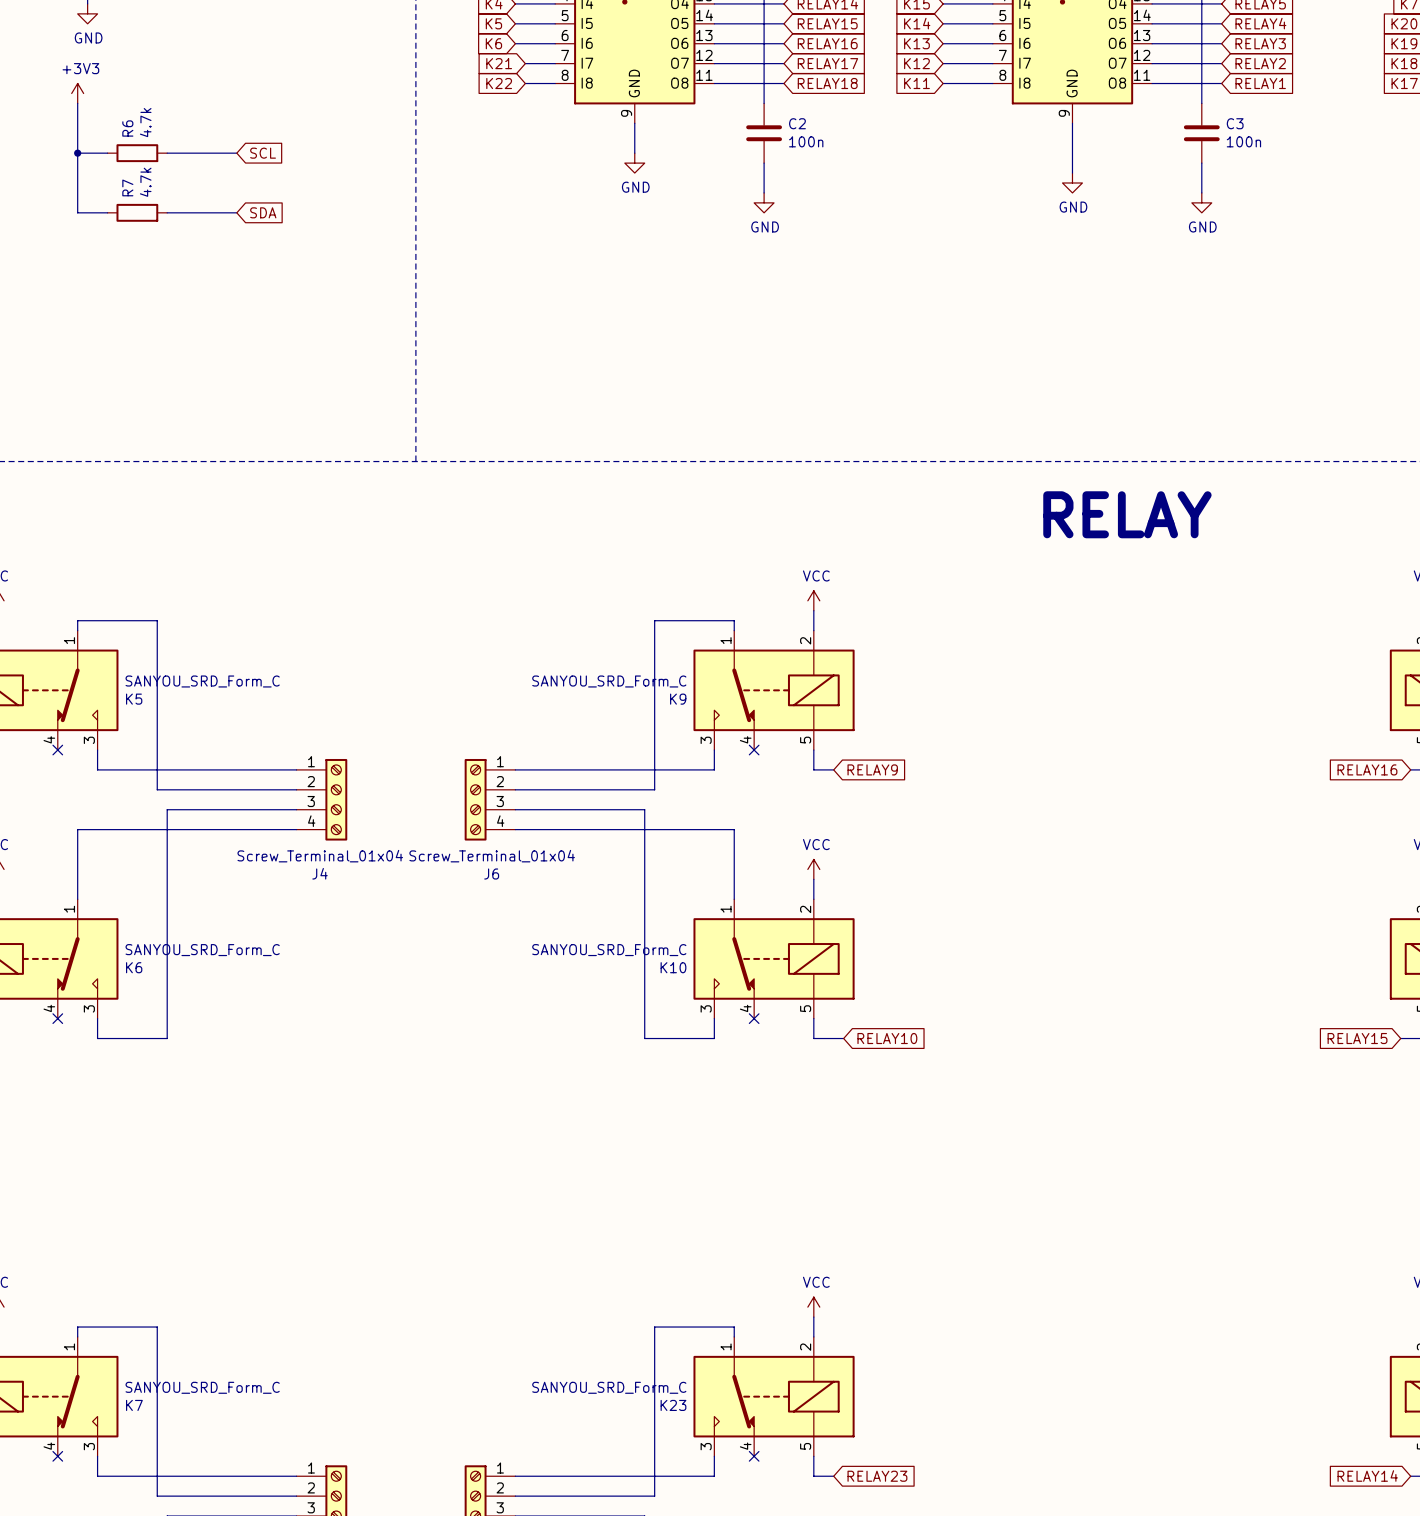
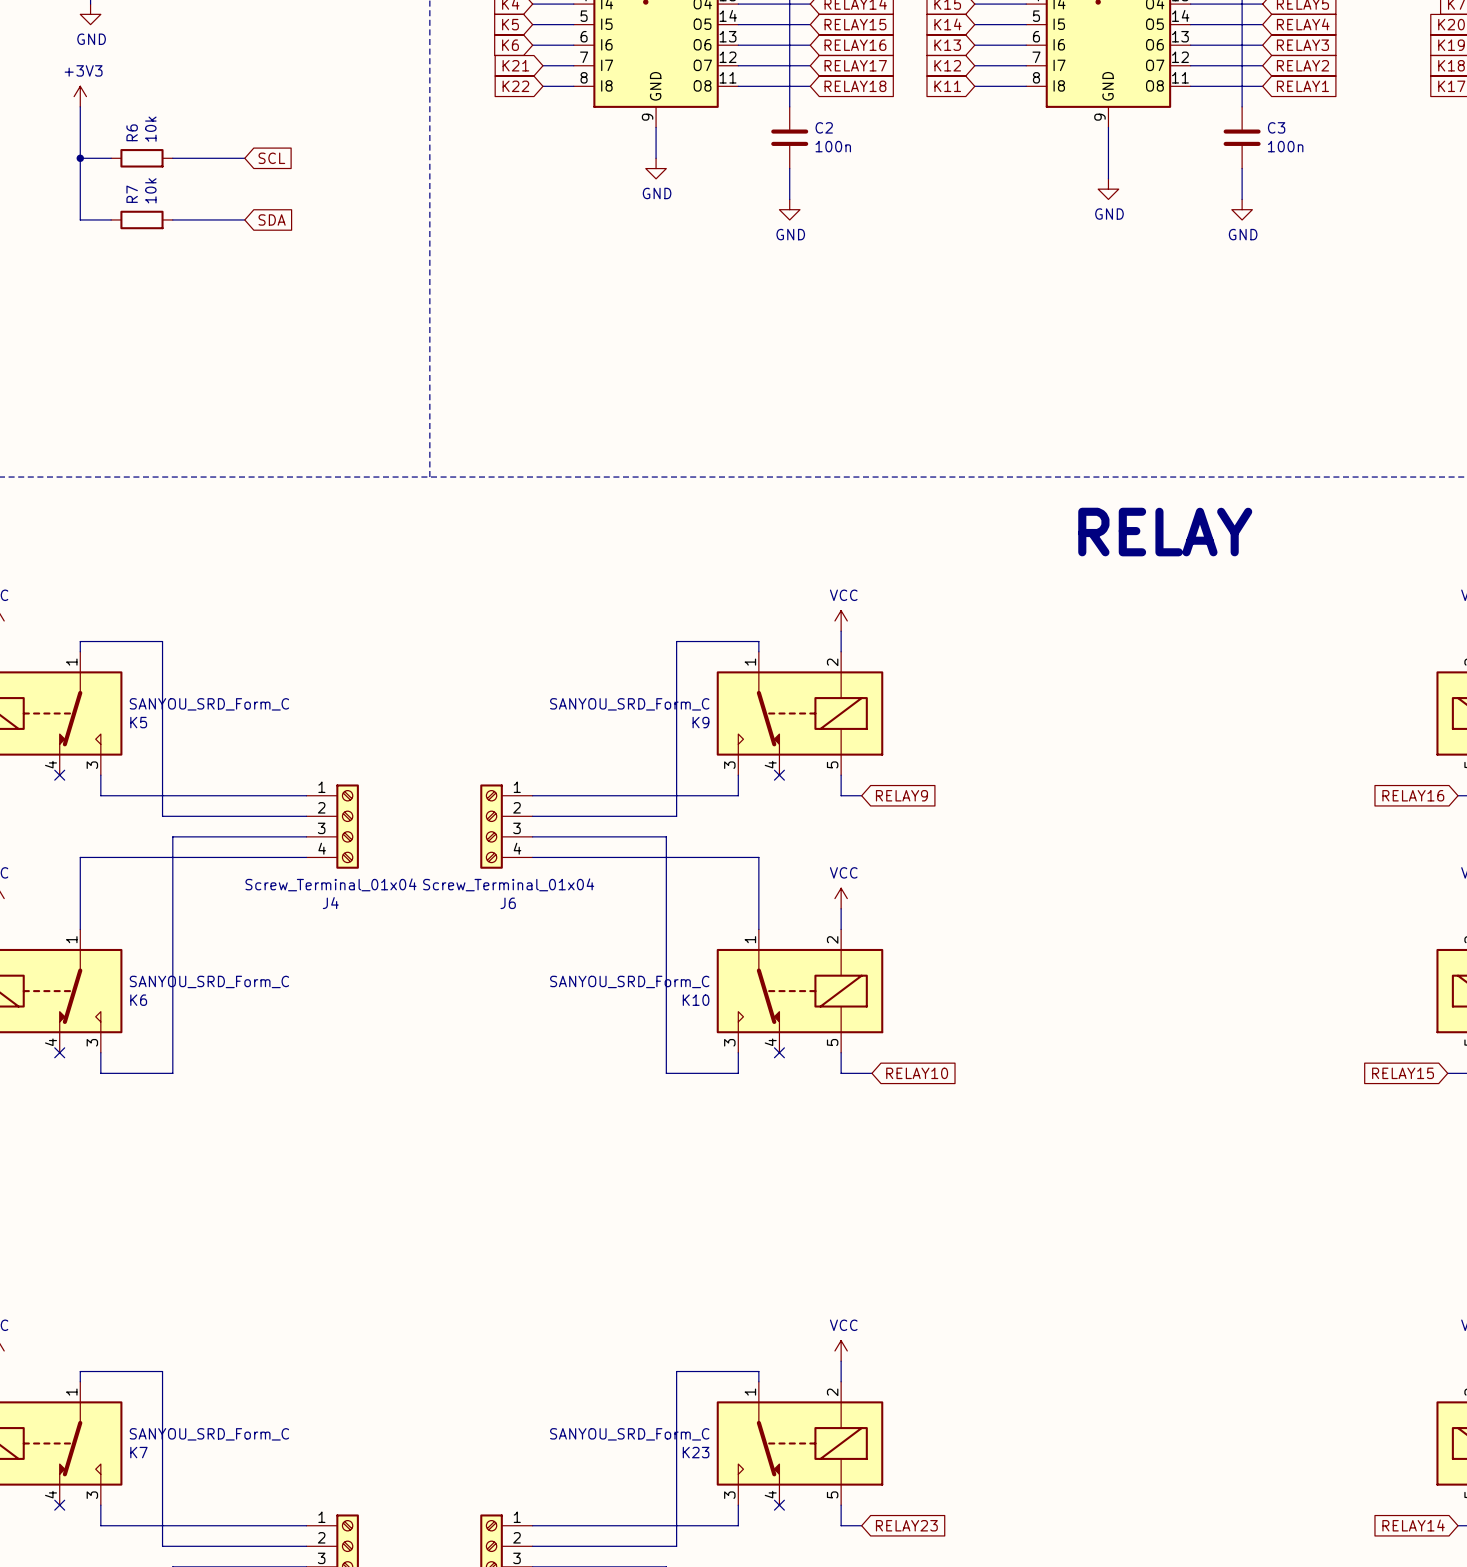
R6 value: 4.7k (145, 122) -> 10k (150, 129)
R7 value: 4.7k (145, 182) -> 10k (150, 190)

